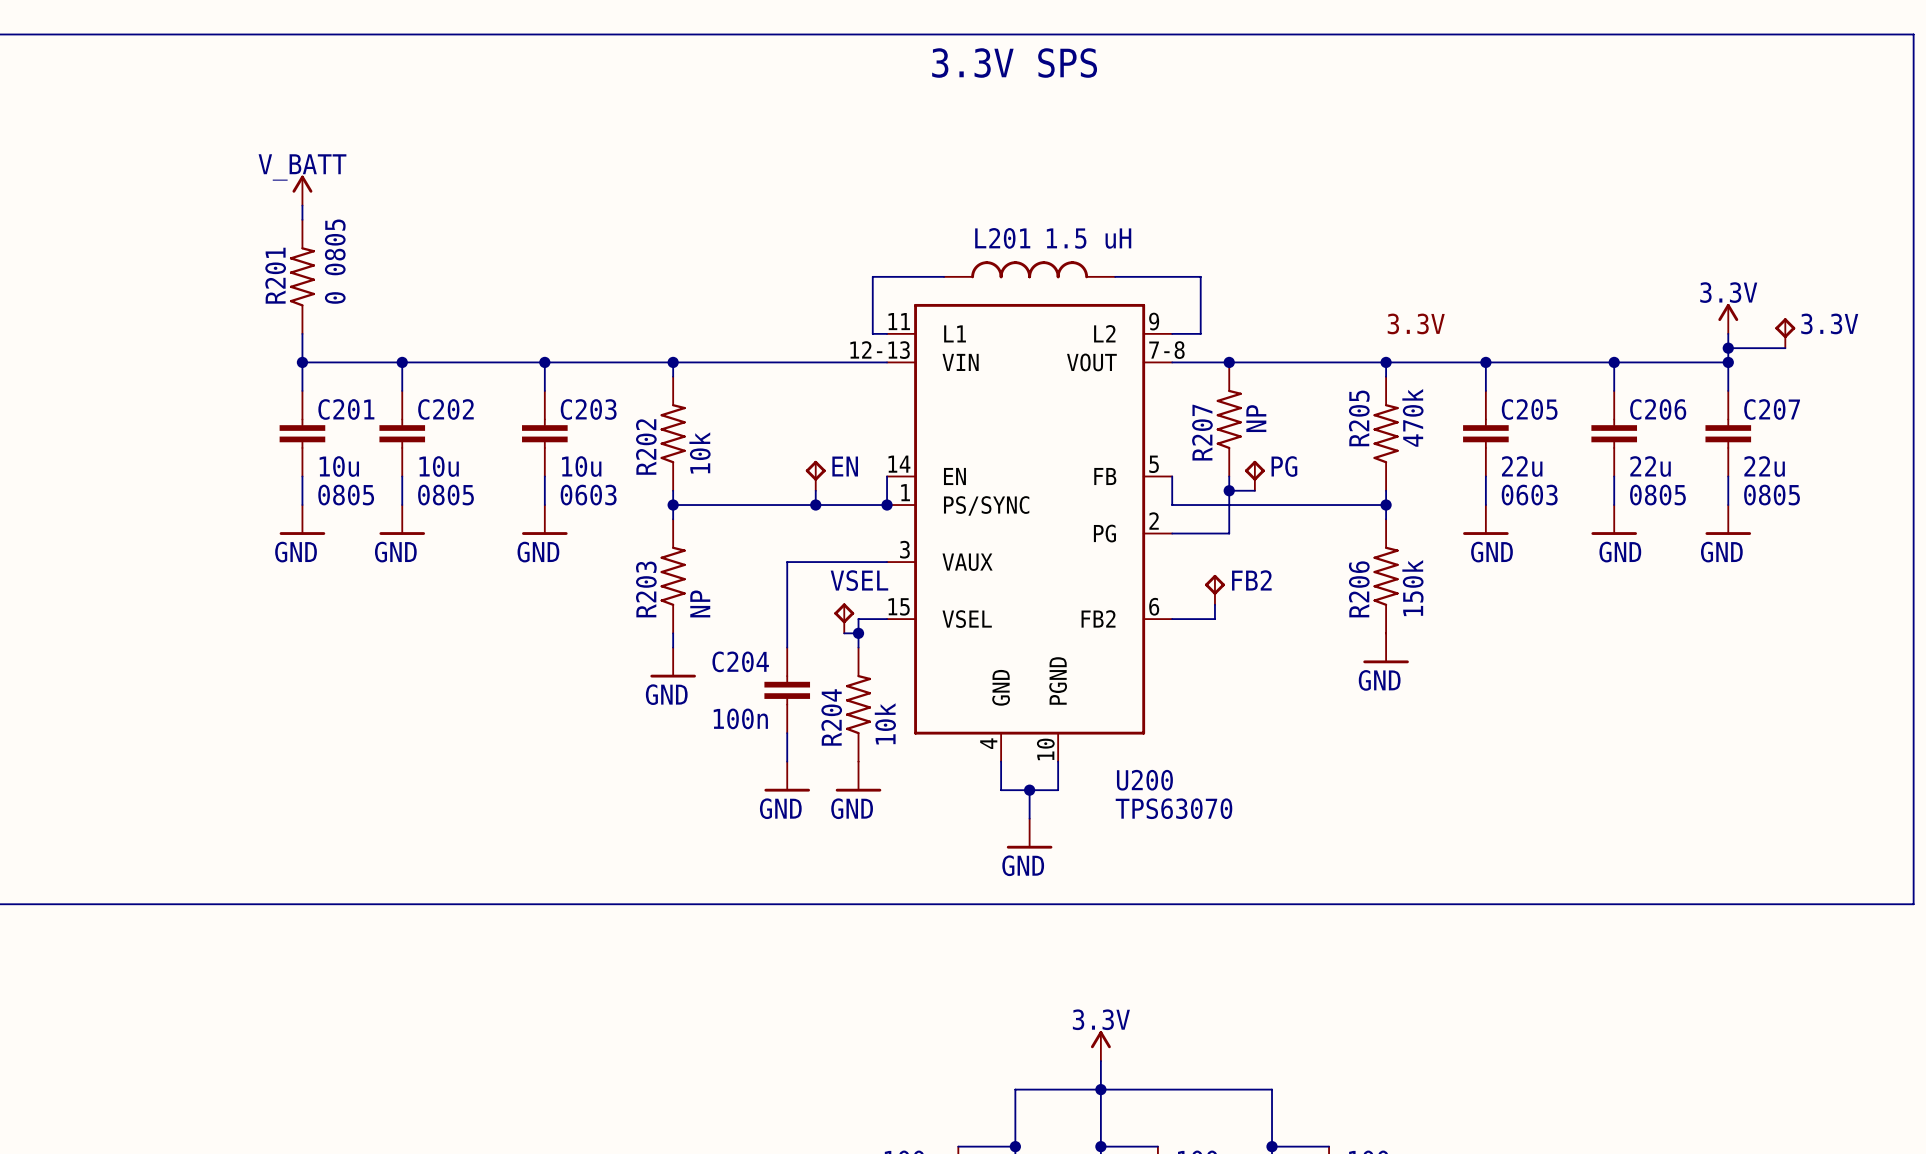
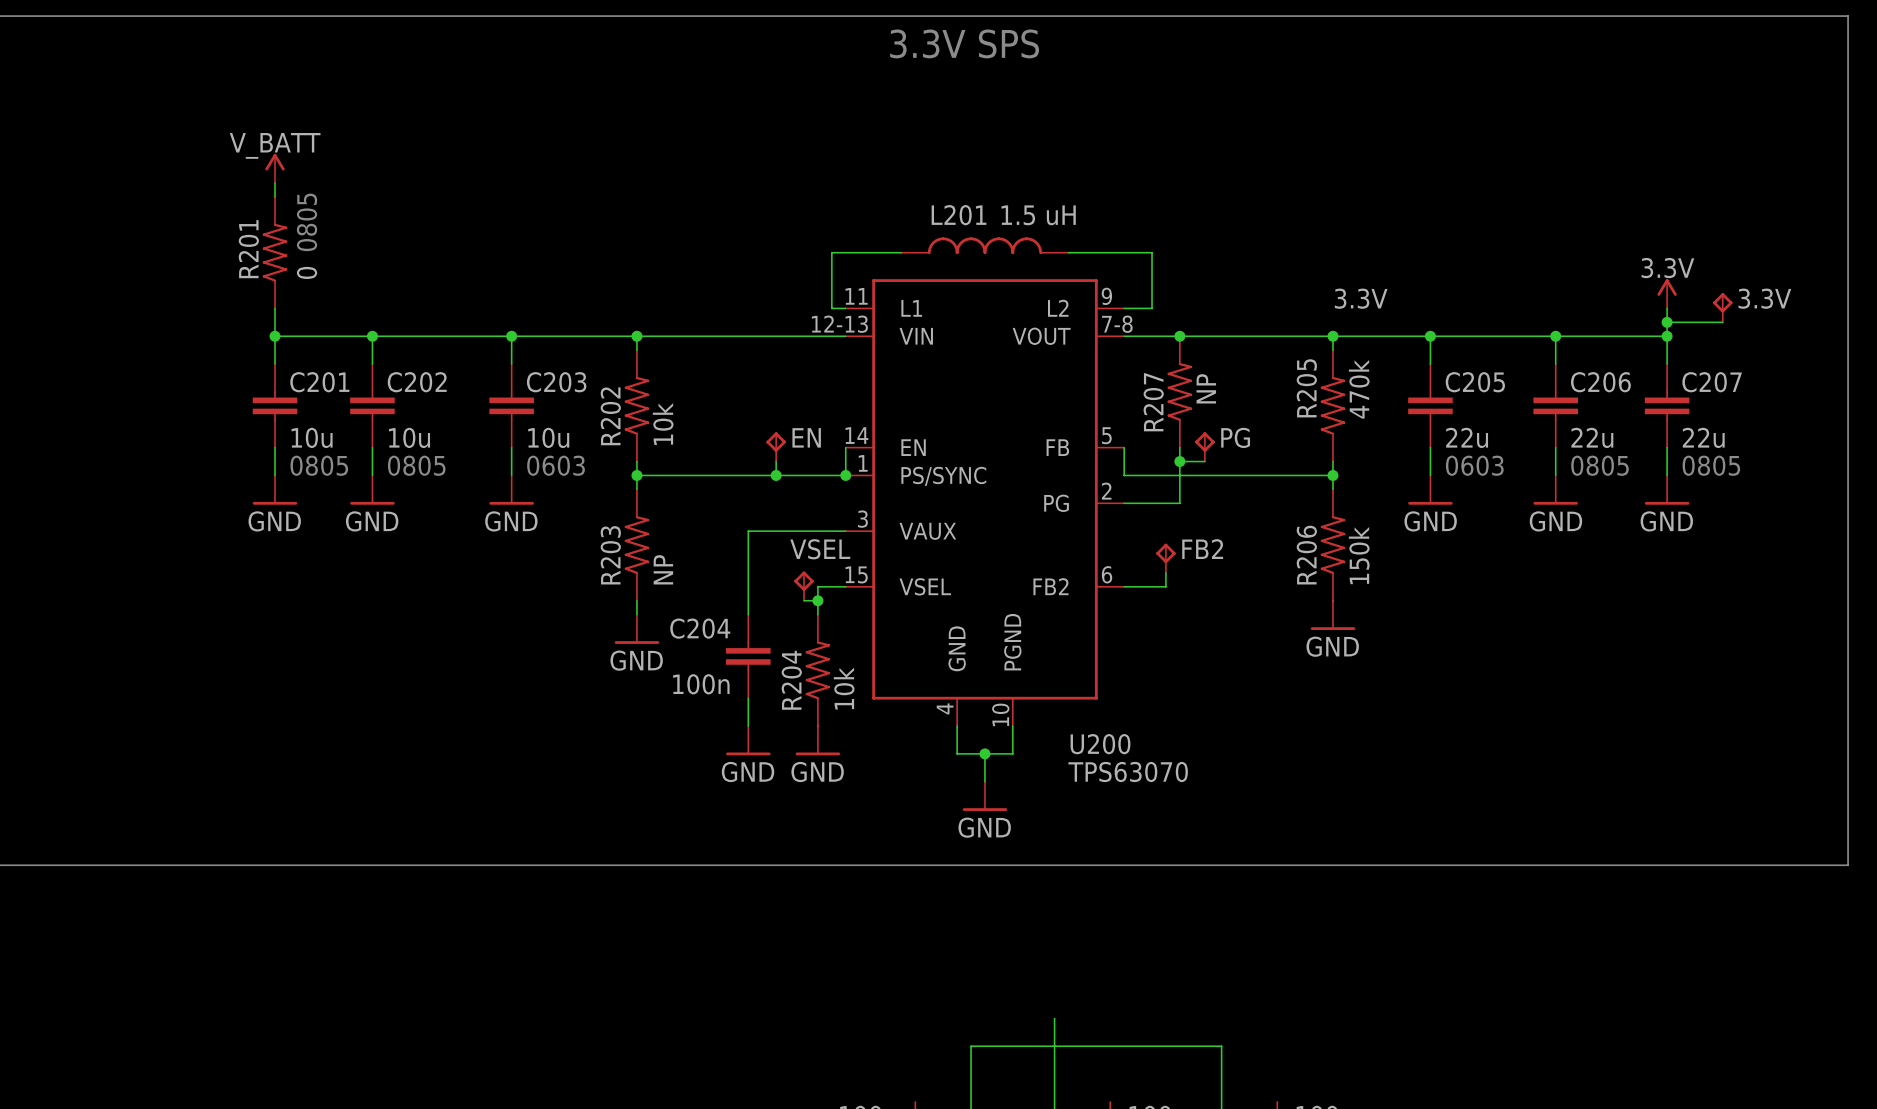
power symbol: 3.3V (1100, 1046) -> none
junction: (1100, 1089) -> none
wire: (958, 1146) (1015, 1146) -> none
junction: (1015, 1146) -> none
wire: (1100, 1146) (1157, 1146) -> none
junction: (1100, 1146) -> none
wire: (1272, 1146) (1329, 1146) -> none
junction: (1272, 1146) -> none

